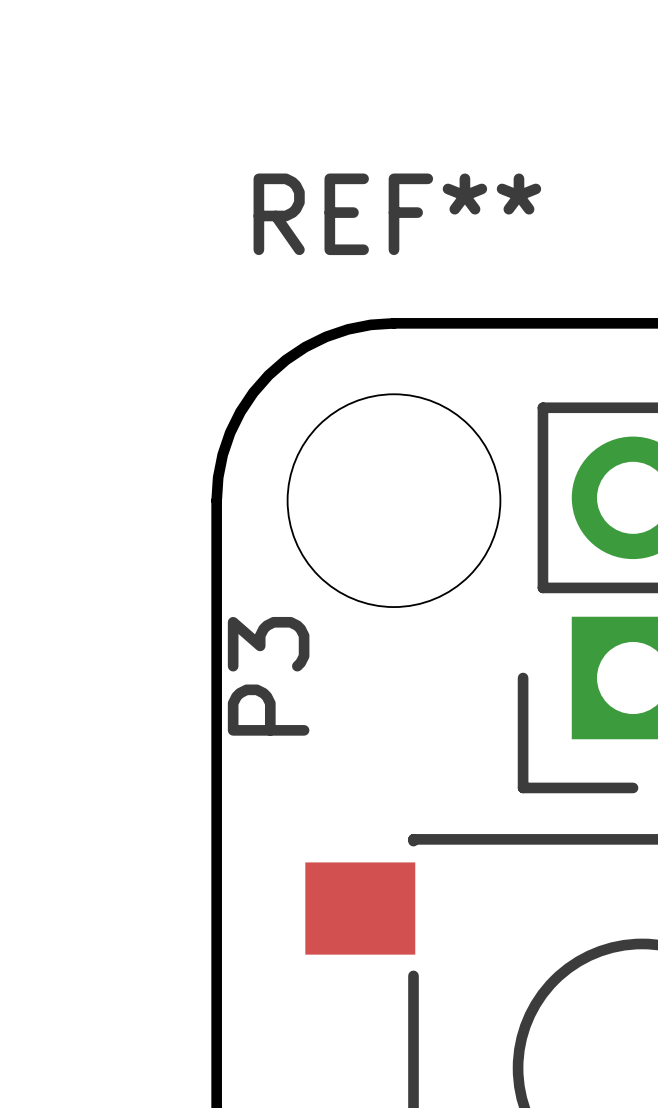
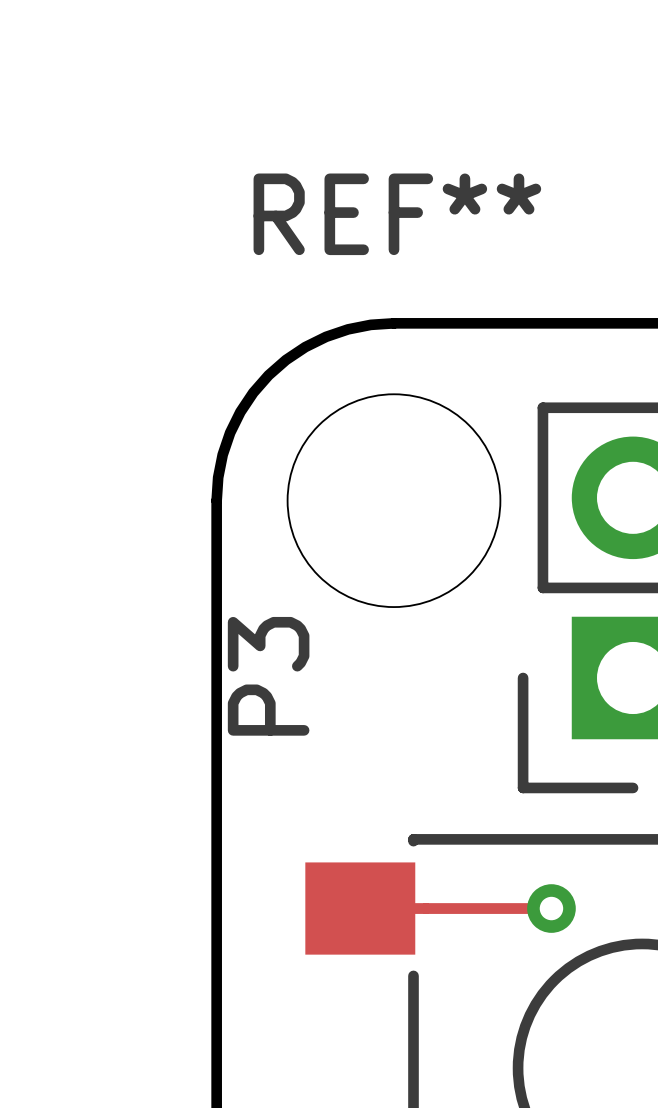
track: none -> (360, 908) (551, 908)
via: none -> (551, 908)

